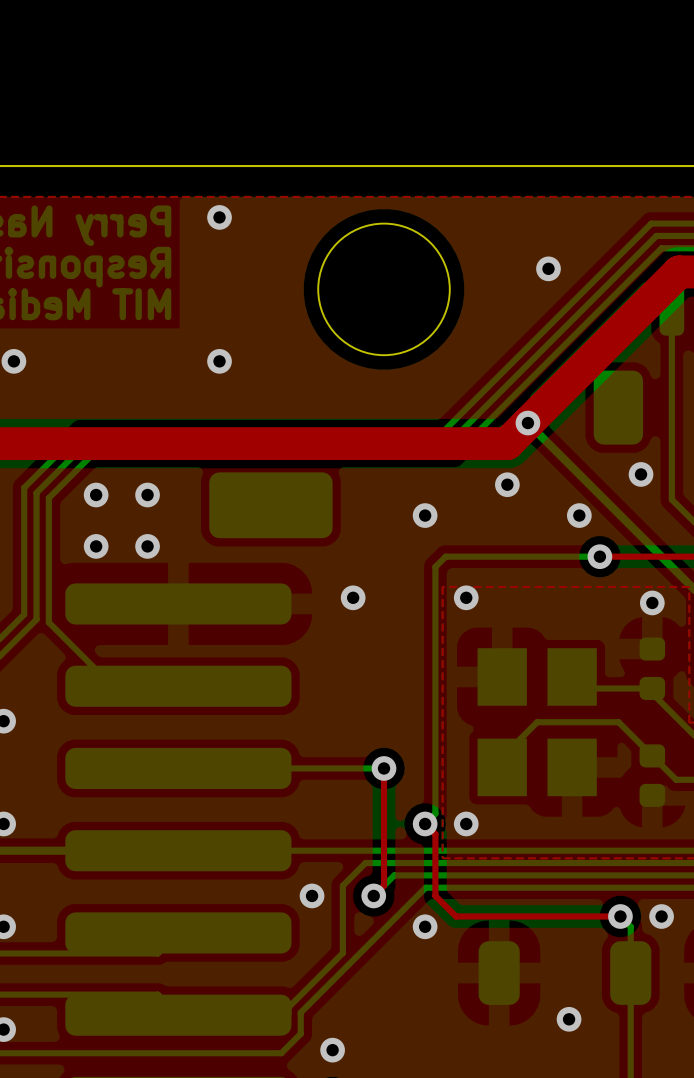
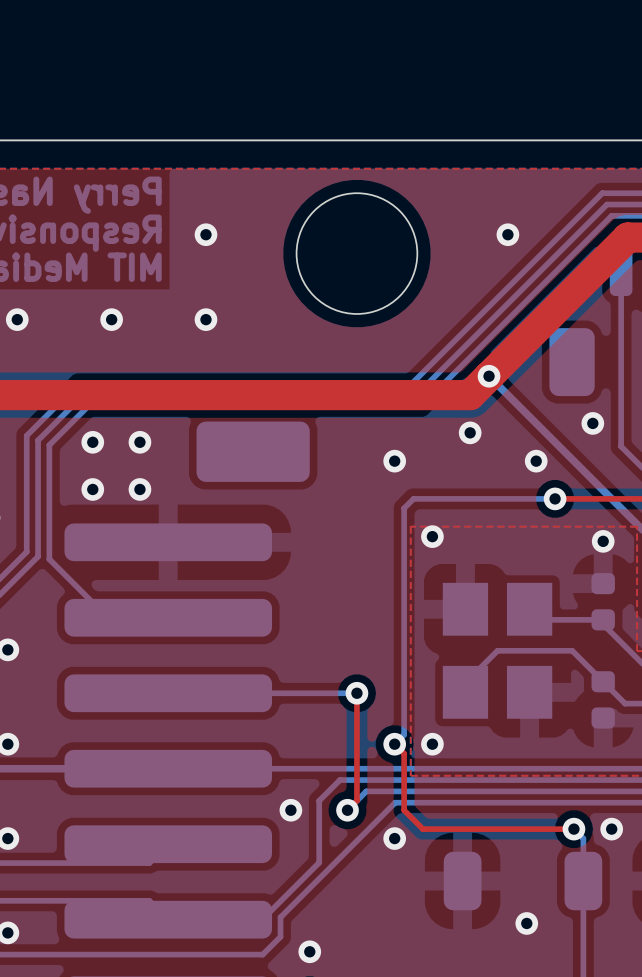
via position: (219, 217) -> (205, 234)
via: none -> (111, 319)
via: (353, 597) -> none

